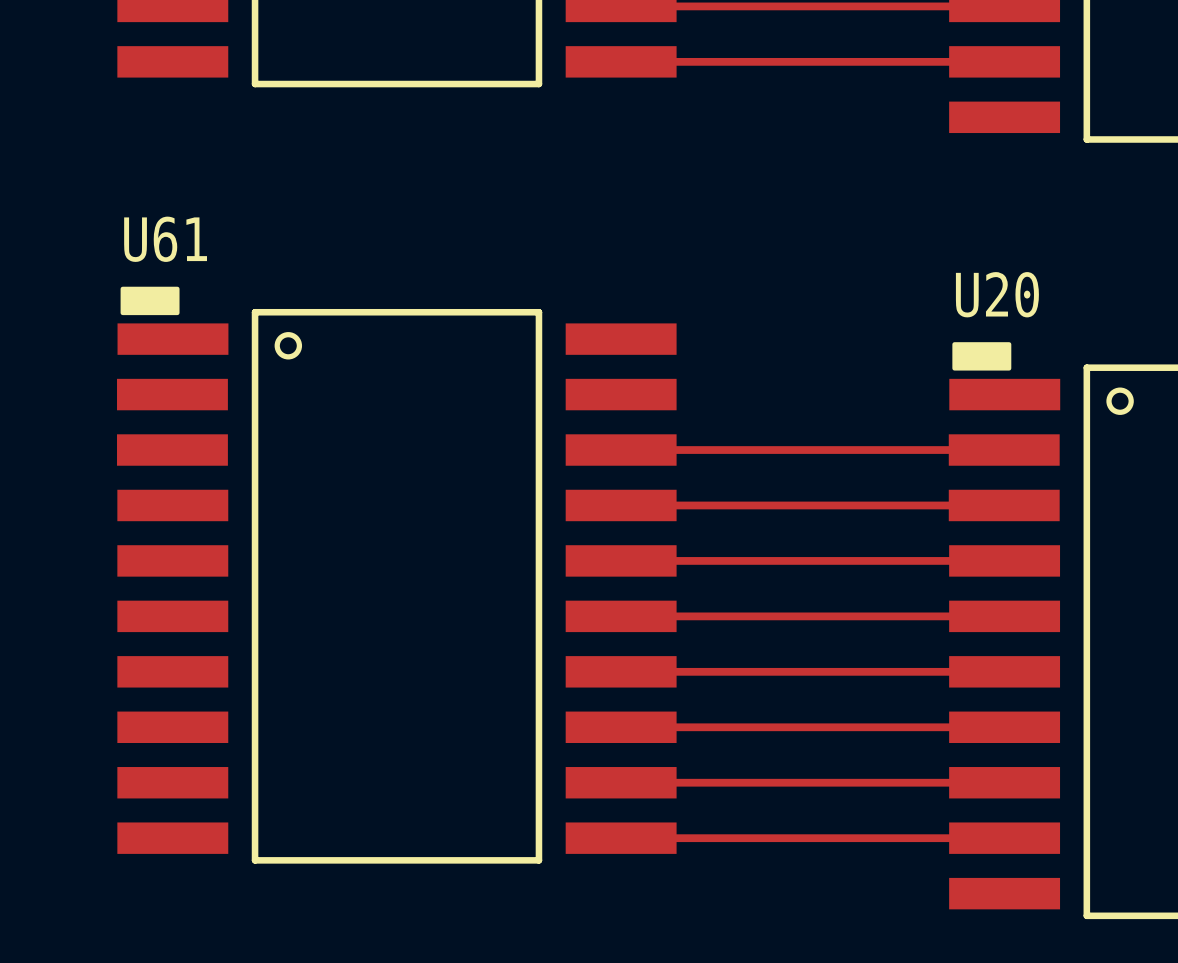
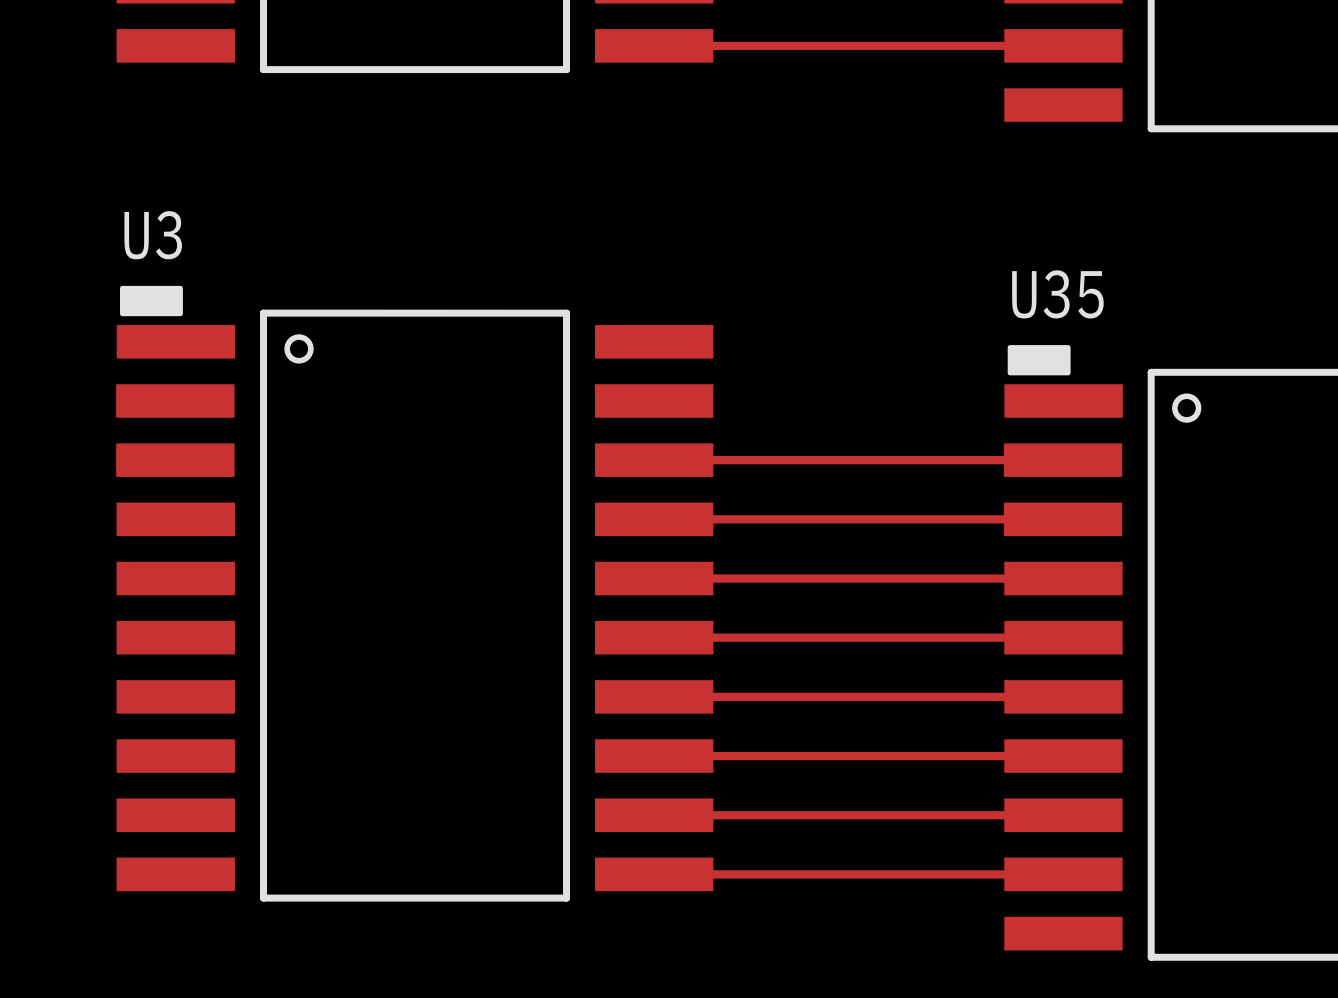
U61 name: U61 (165, 239) -> U3 (153, 235)
U20 name: U20 (997, 294) -> U35 (1057, 294)

